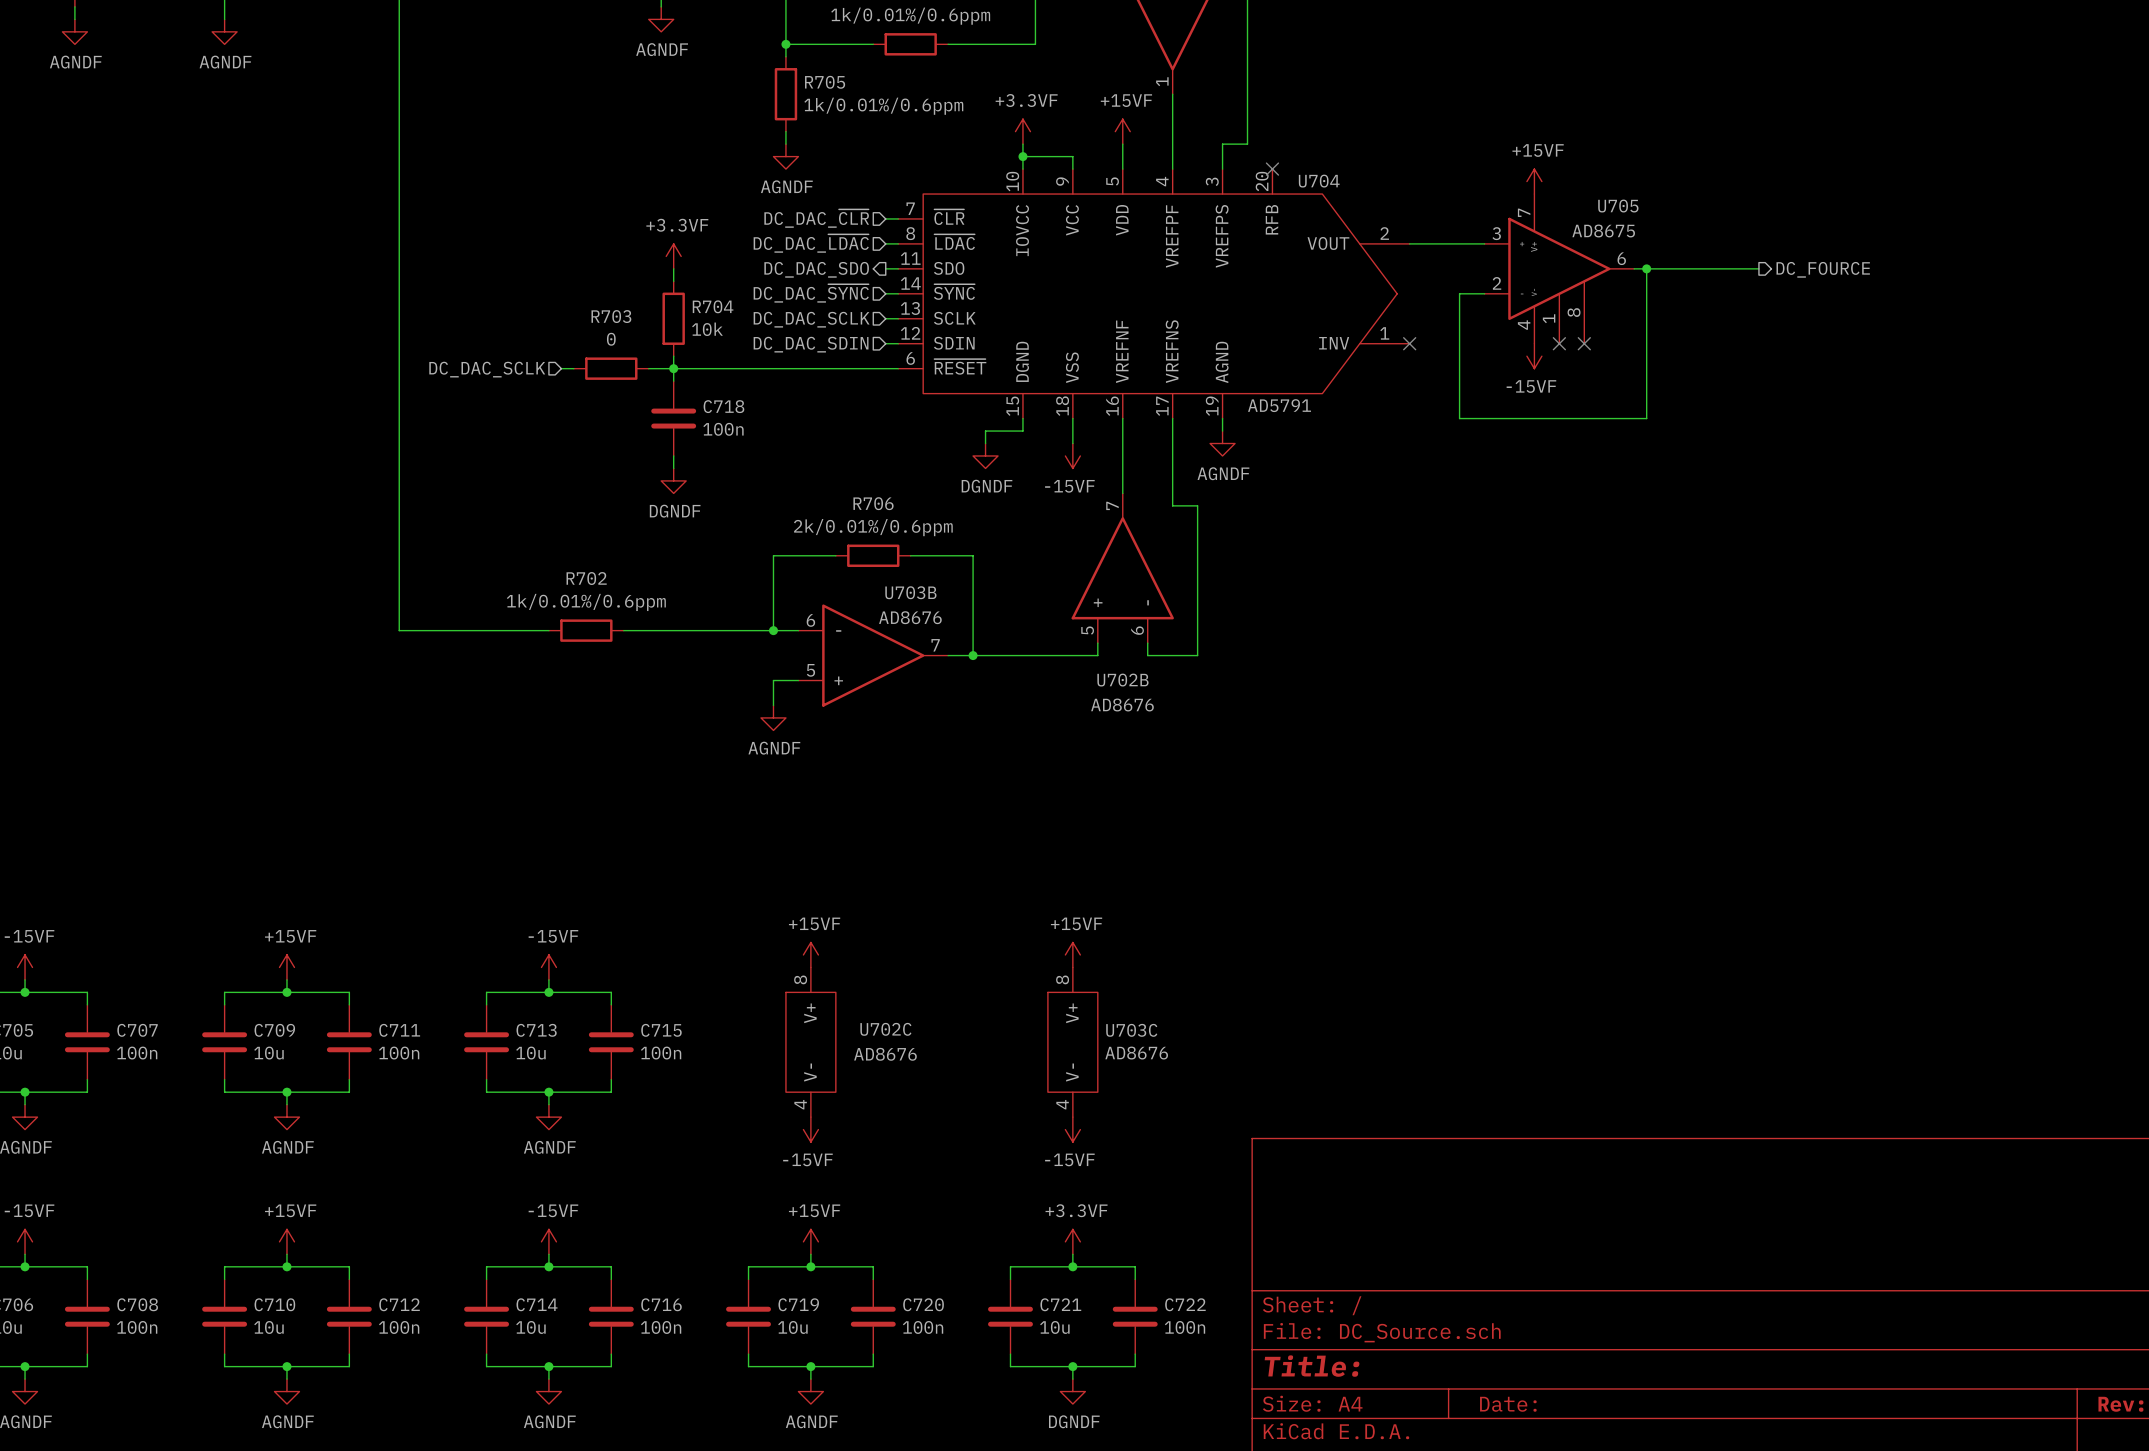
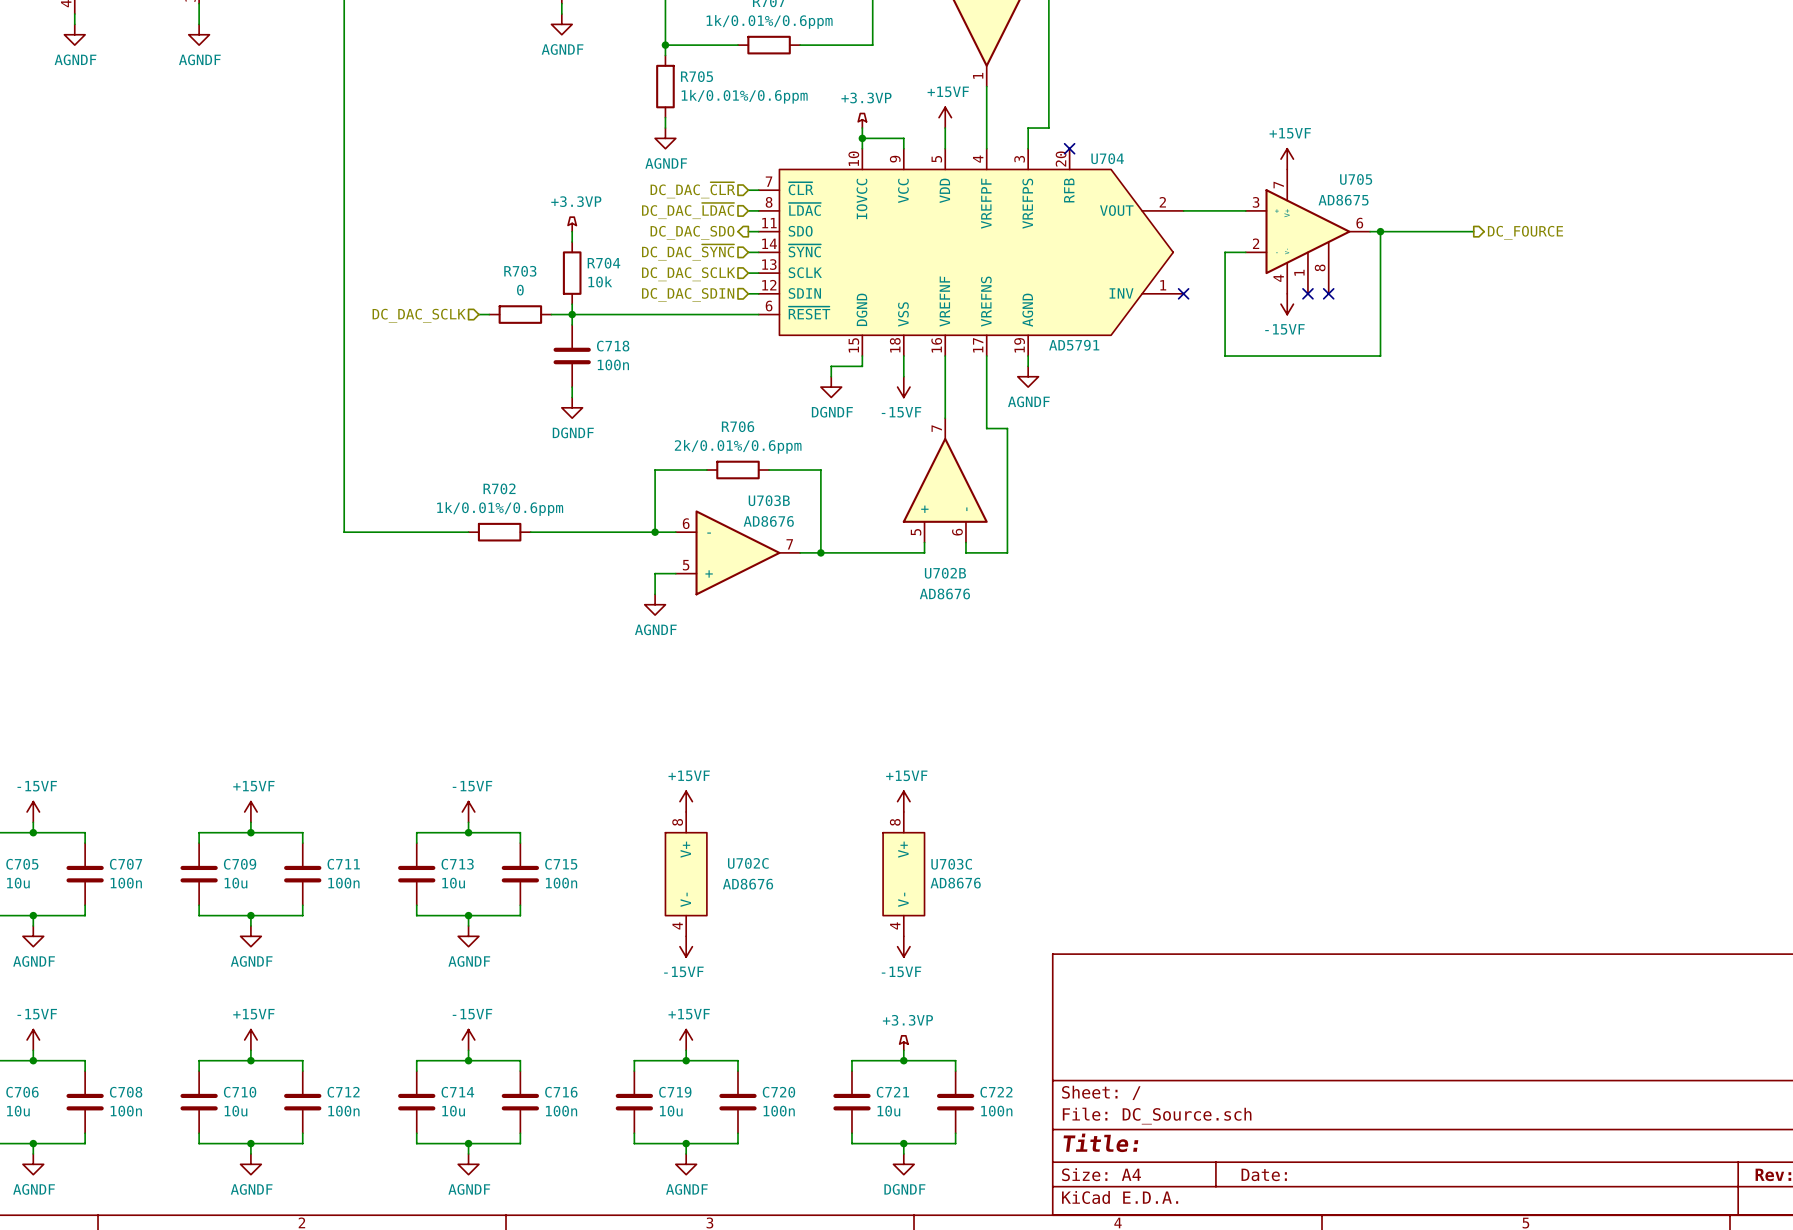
power symbol: +3.3VF (1022, 131) -> +3.3VP (862, 120)
power symbol: +3.3VF (673, 256) -> +3.3VP (572, 224)
power symbol: +3.3VF (1072, 1241) -> +3.3VP (903, 1043)

